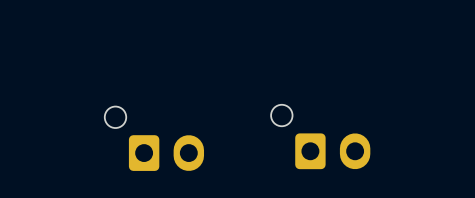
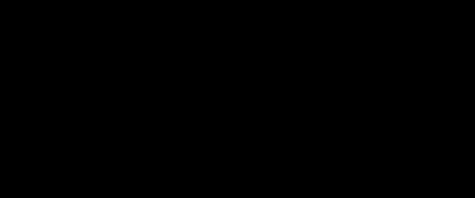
part: (320, 136) -> none
part: (154, 138) -> none

